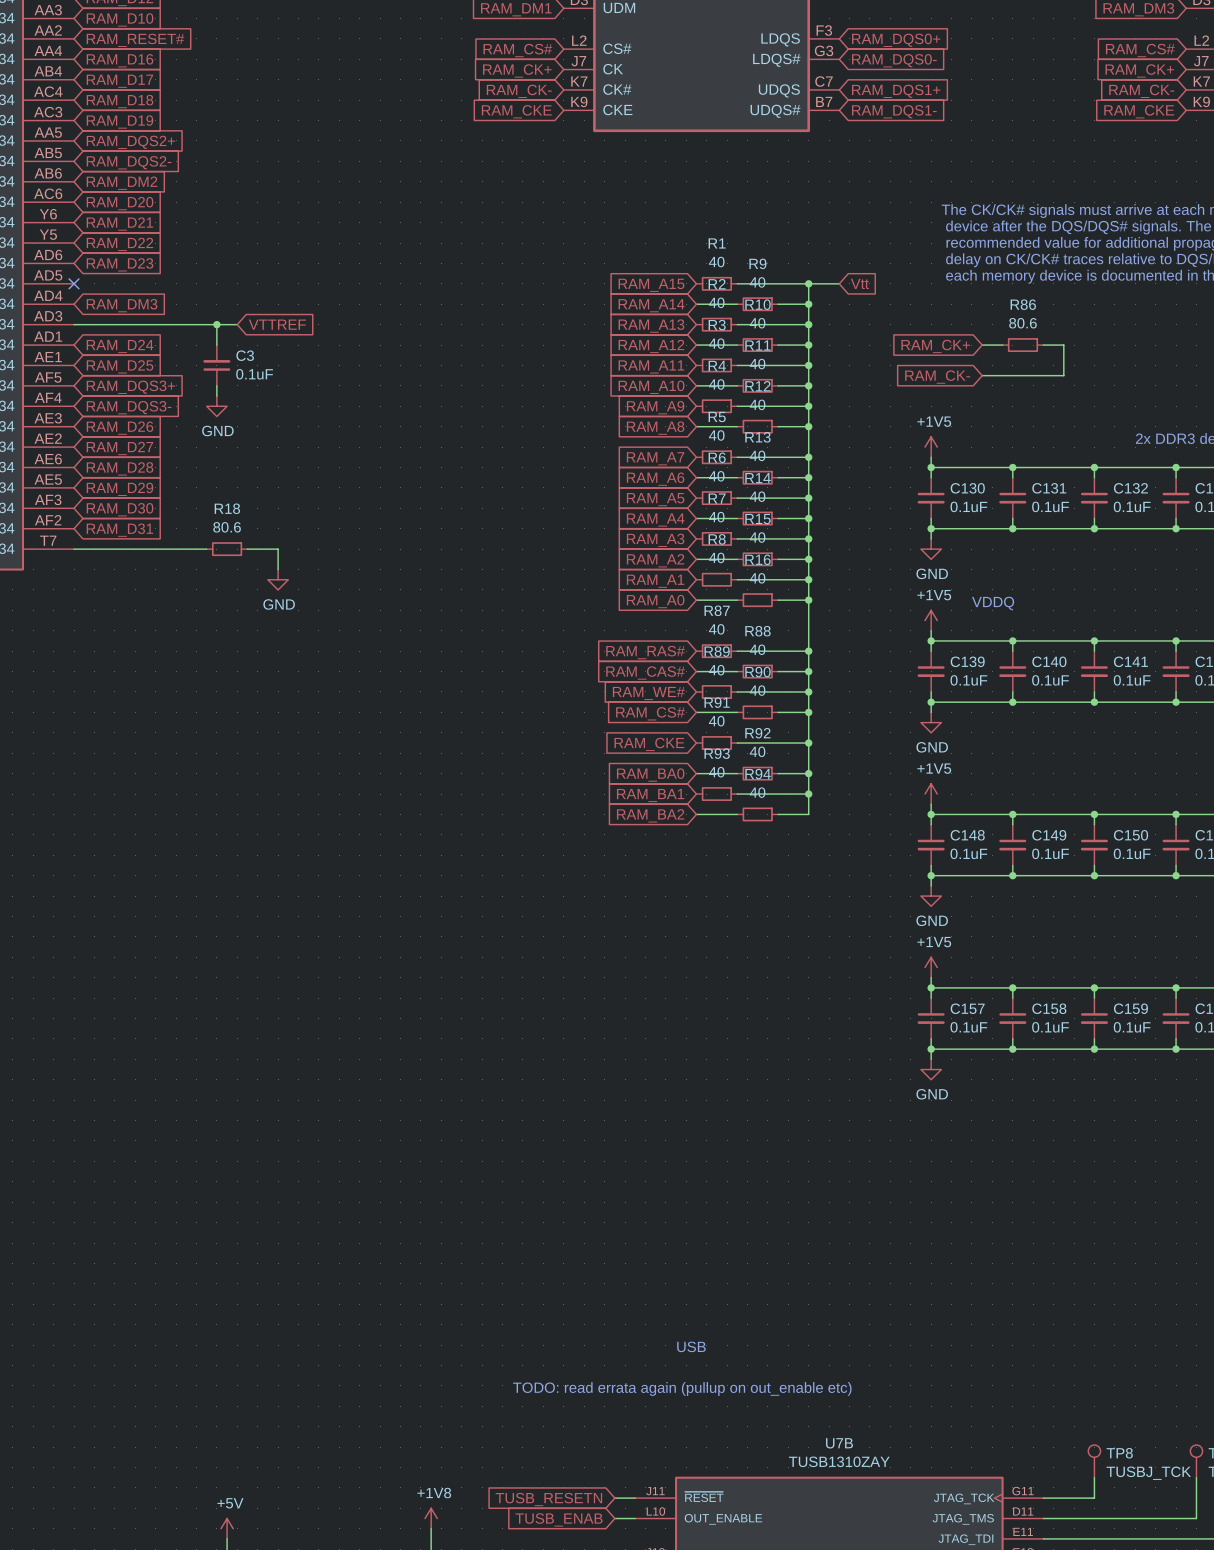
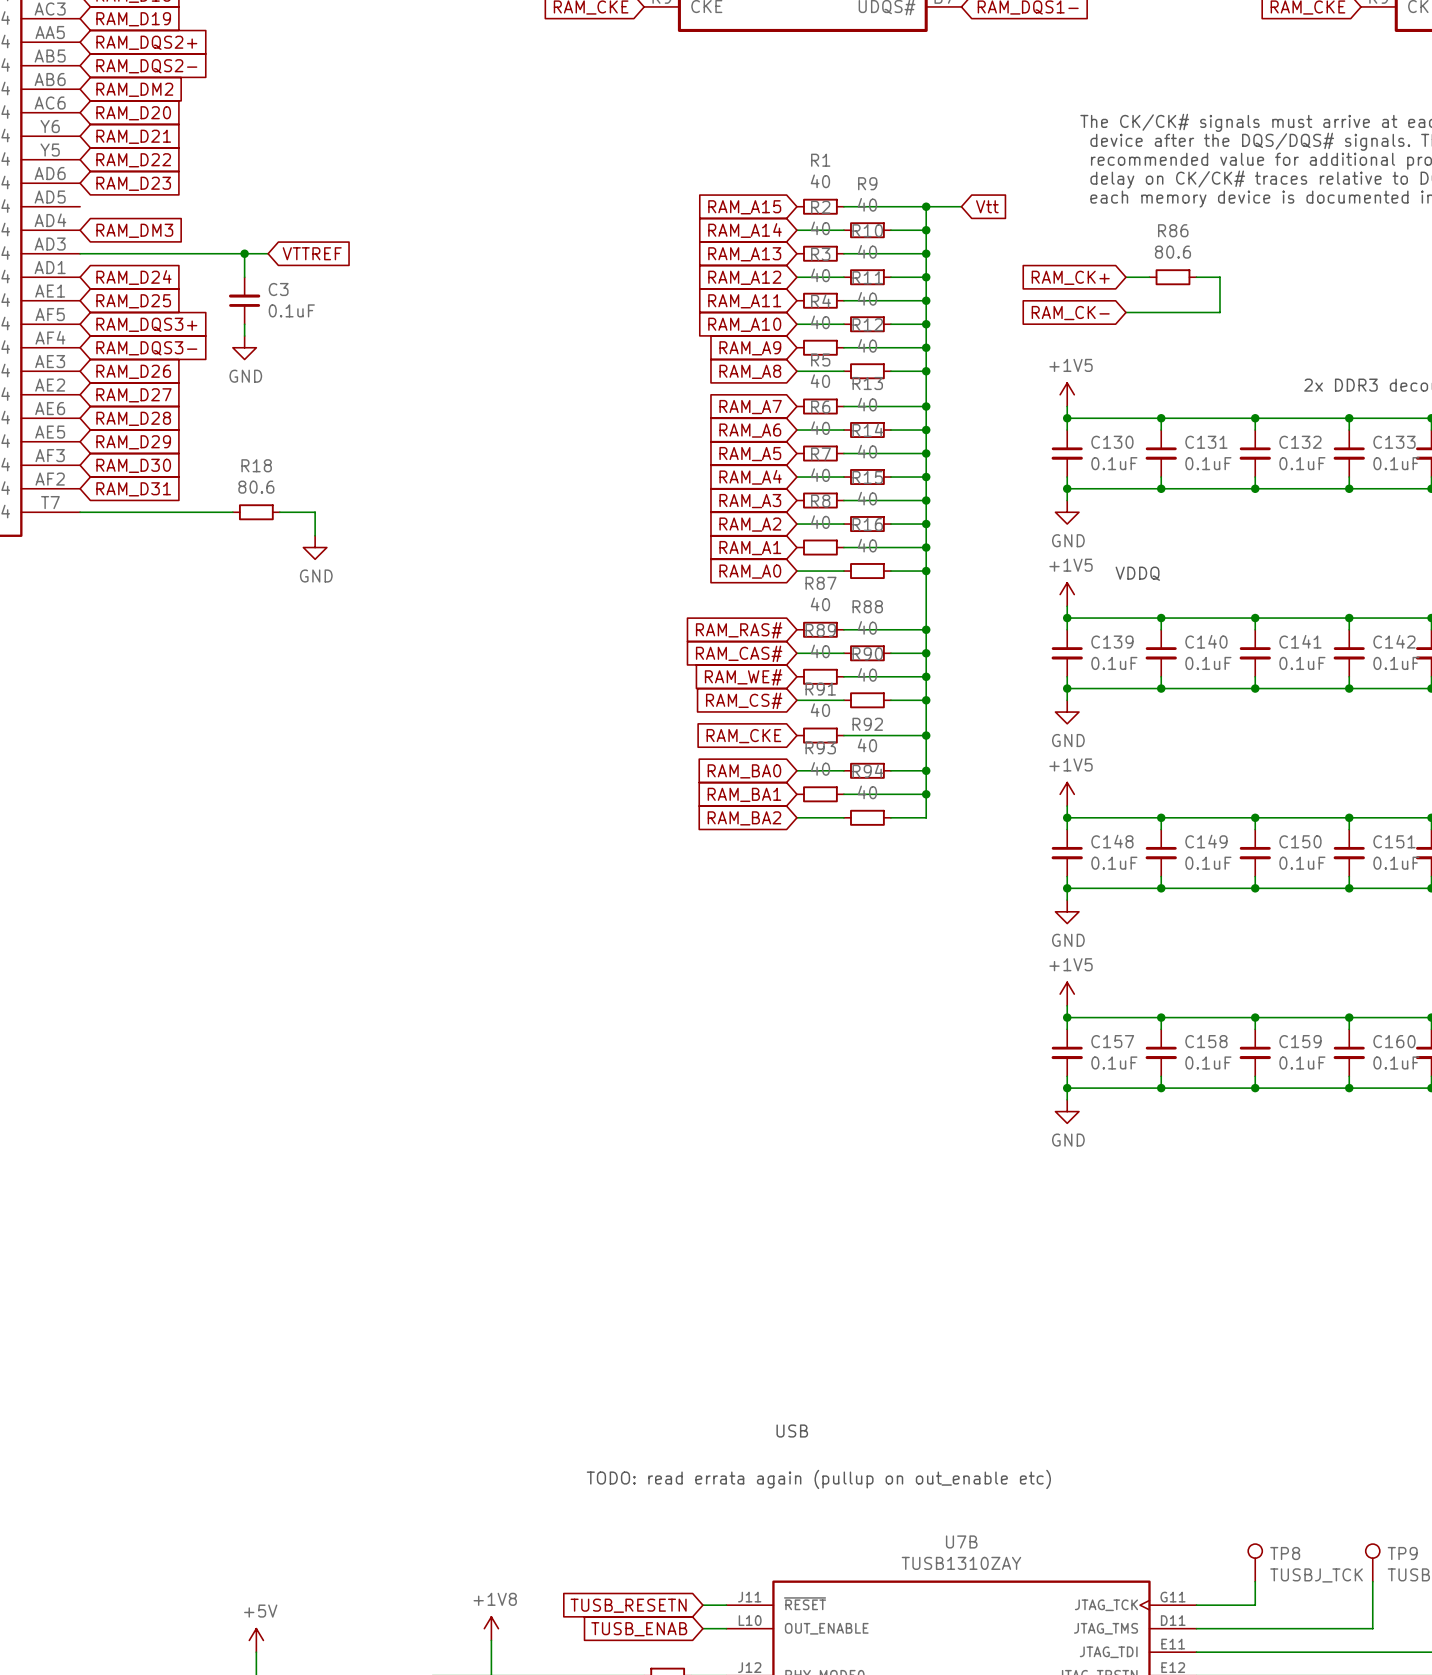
no-connect mark: (74, 283) -> none

